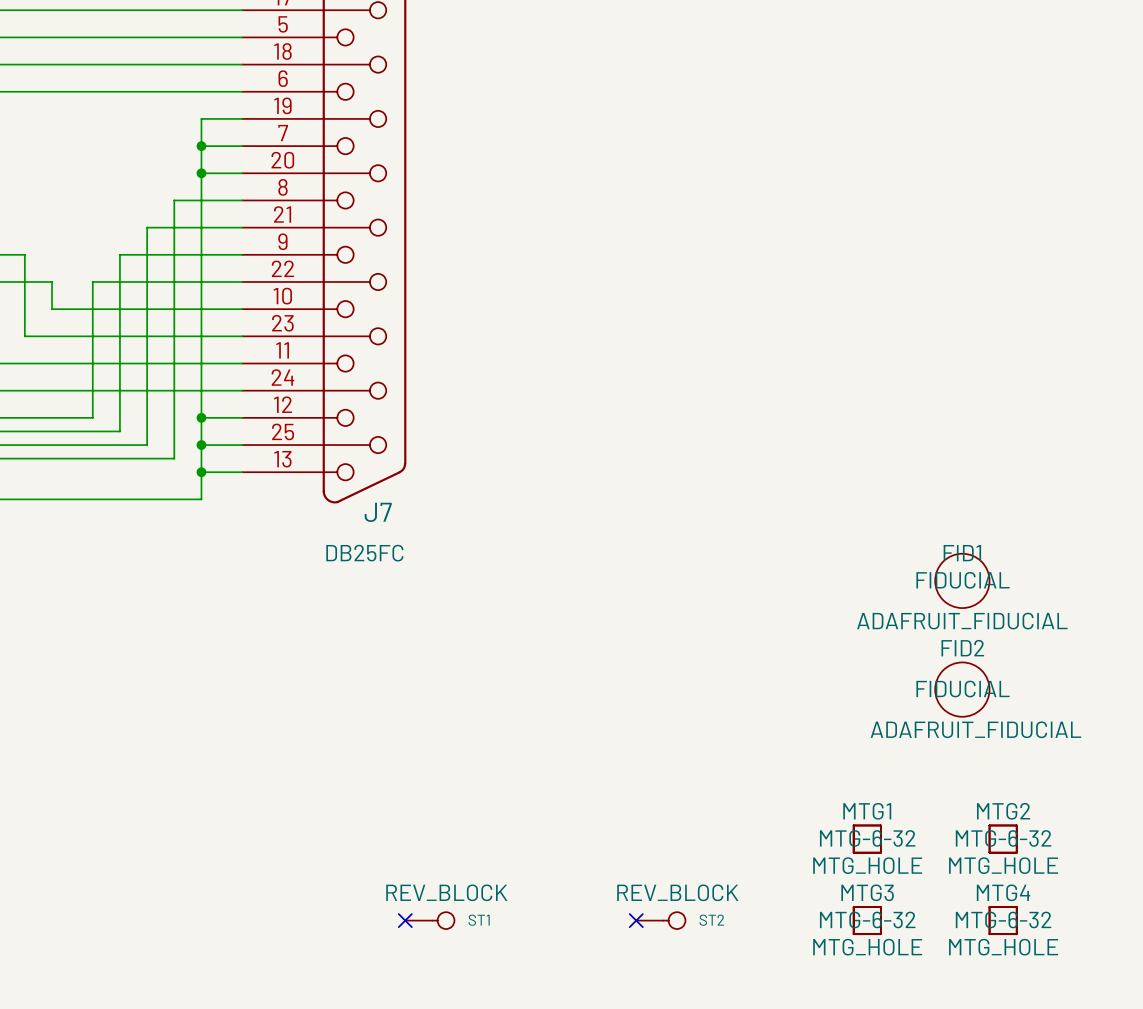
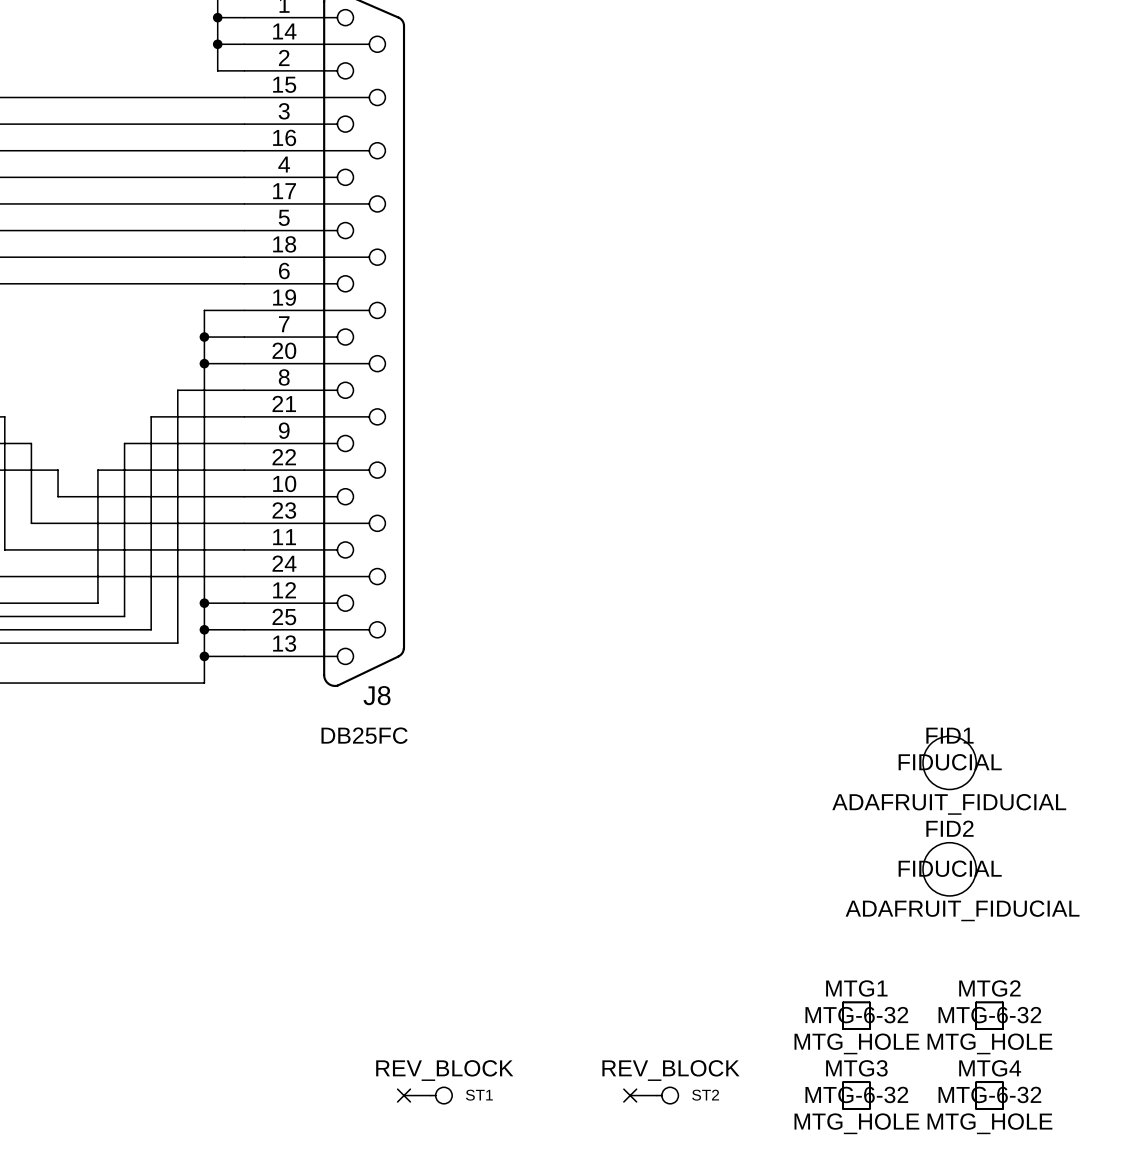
J7 name: J7 (378, 512) -> J8 (377, 695)

